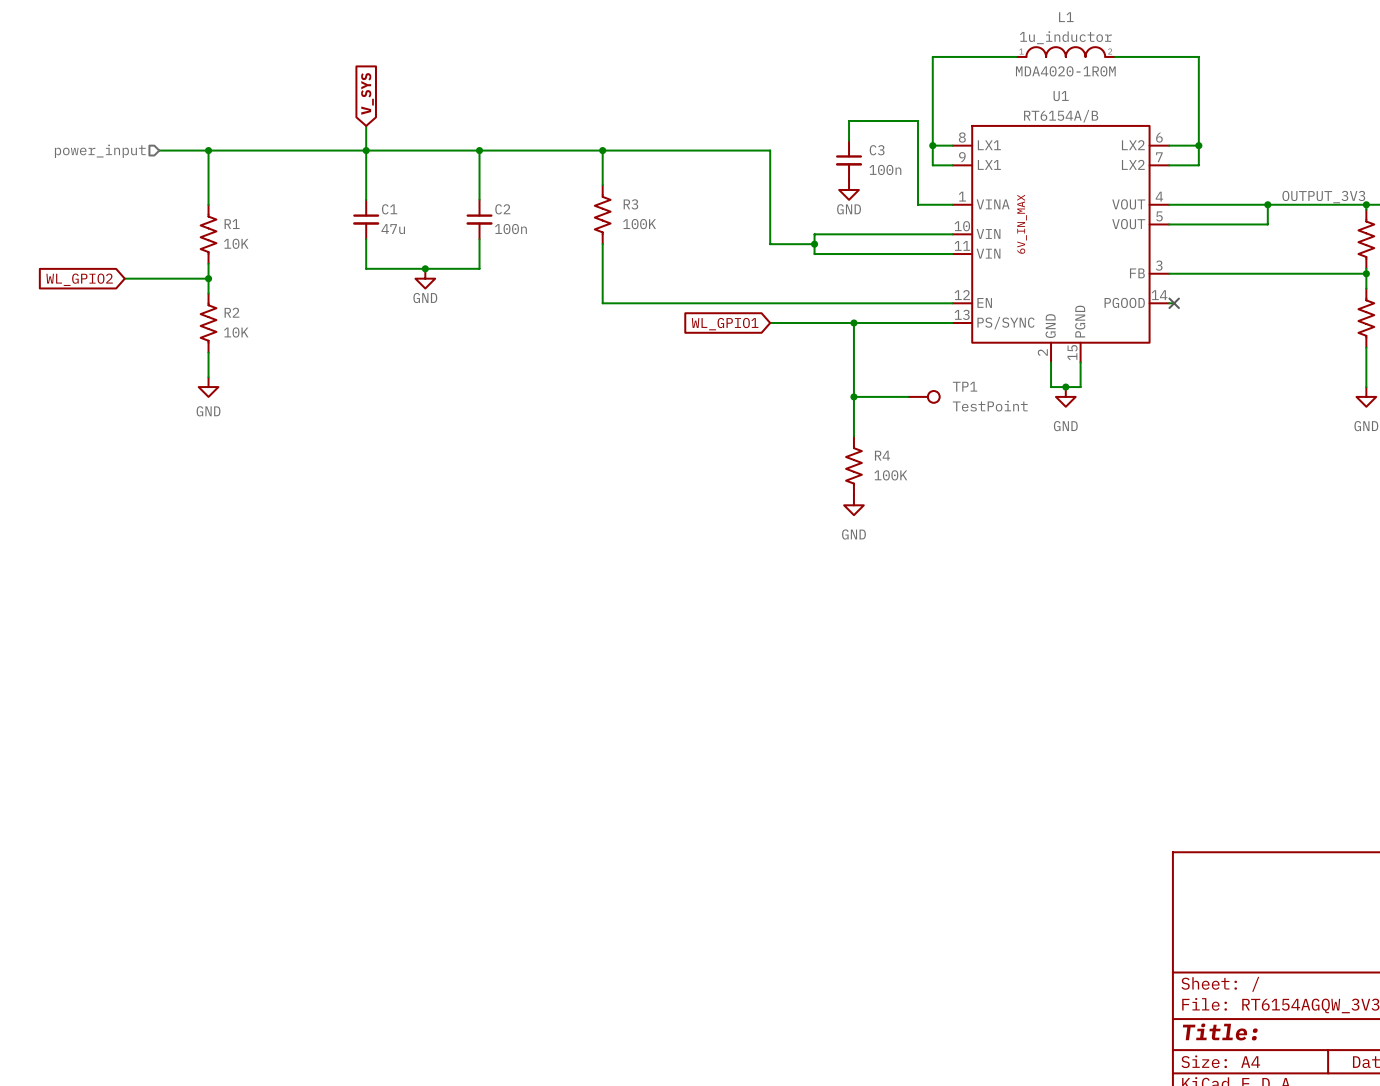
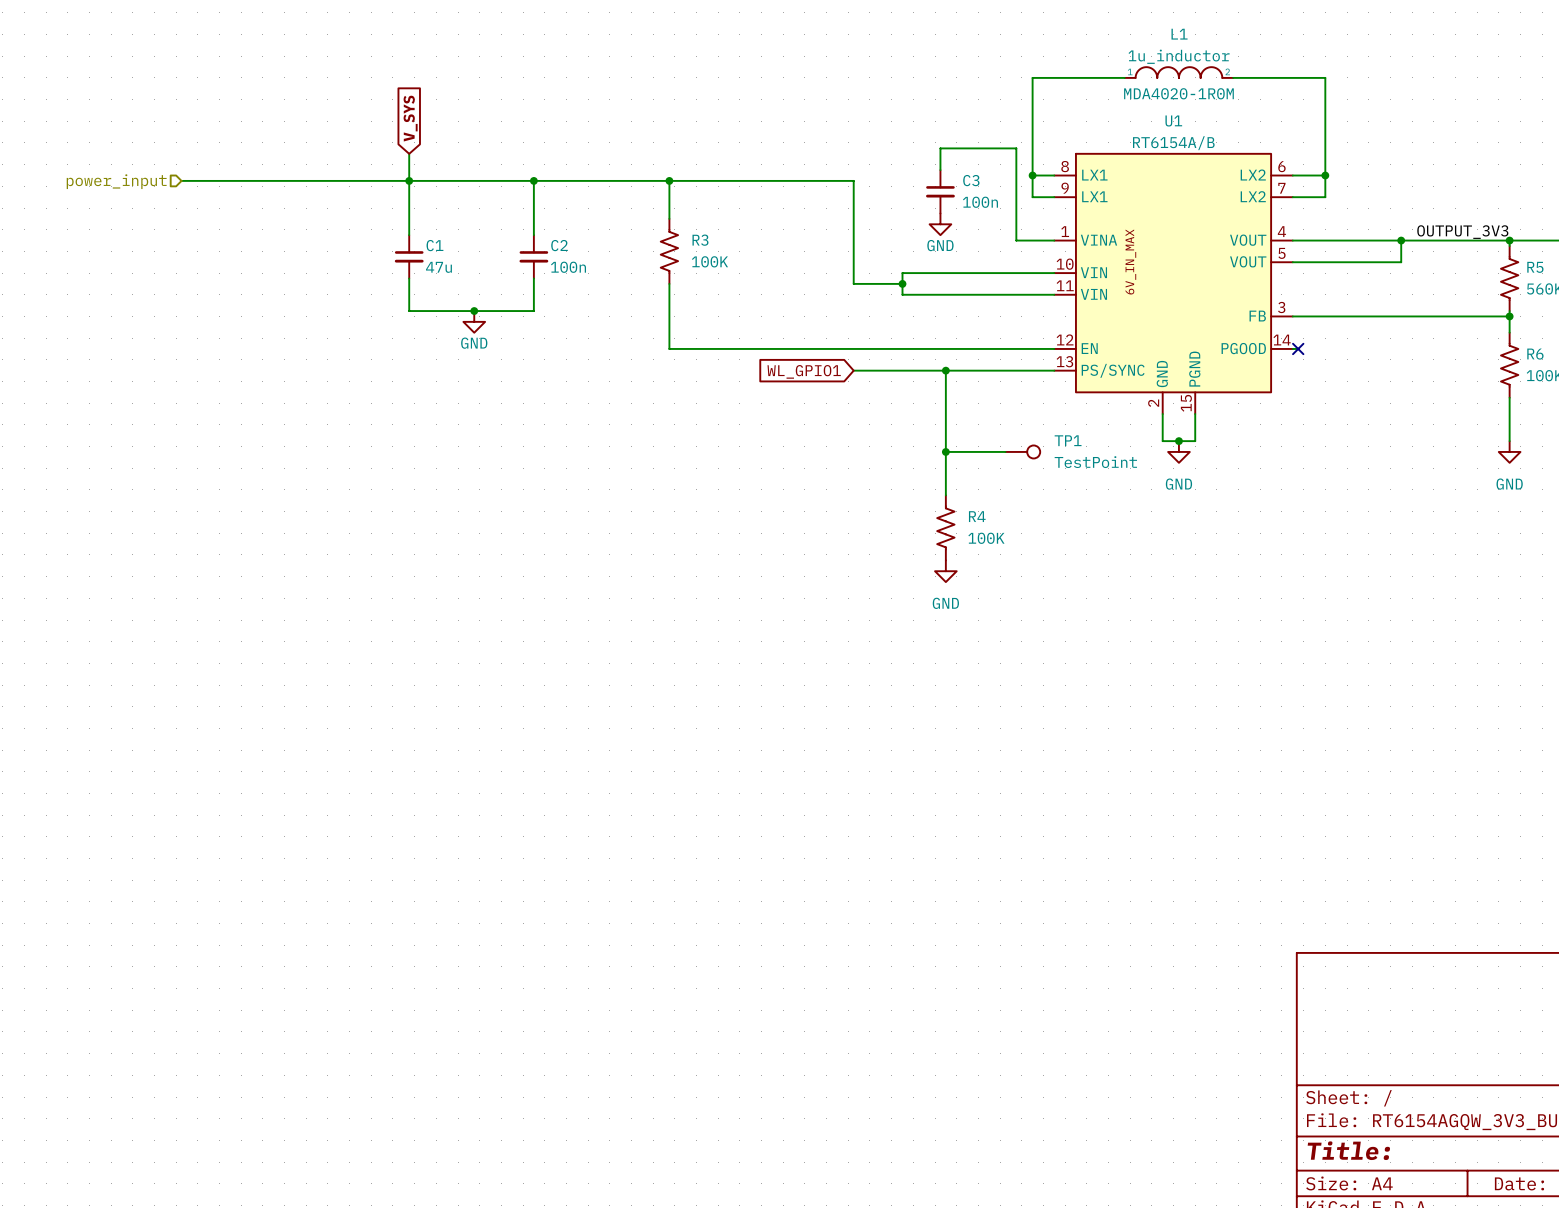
wire: (208, 150) (208, 204) -> none
junction: (208, 150) -> none
R1: 10K (208, 234) -> none
wire: (208, 263) (208, 293) -> none
wire: (124, 278) (208, 278) -> none
junction: (208, 278) -> none
global label: WL_GPIO2 (79, 279) -> none
R2: 10K (208, 323) -> none
wire: (208, 352) (208, 377) -> none
power symbol: GND (208, 387) -> none

